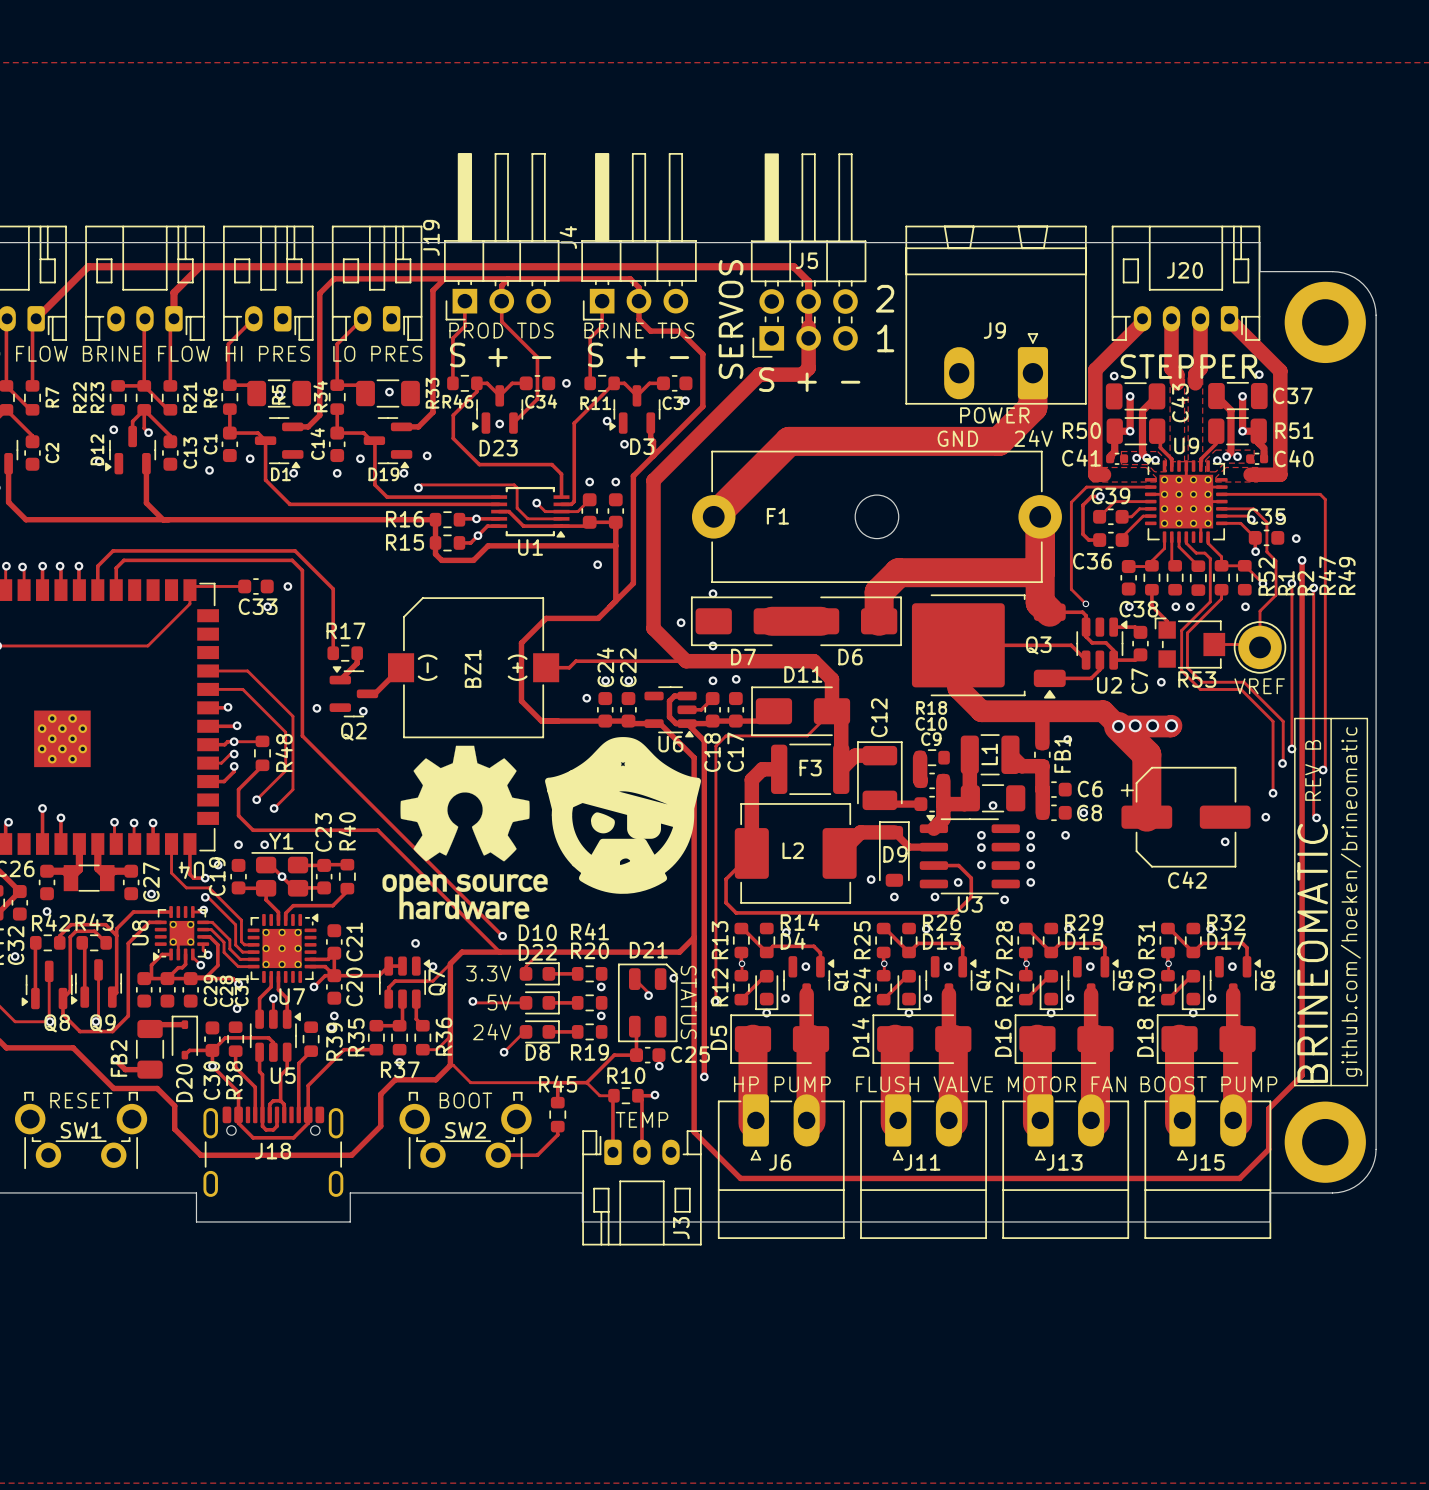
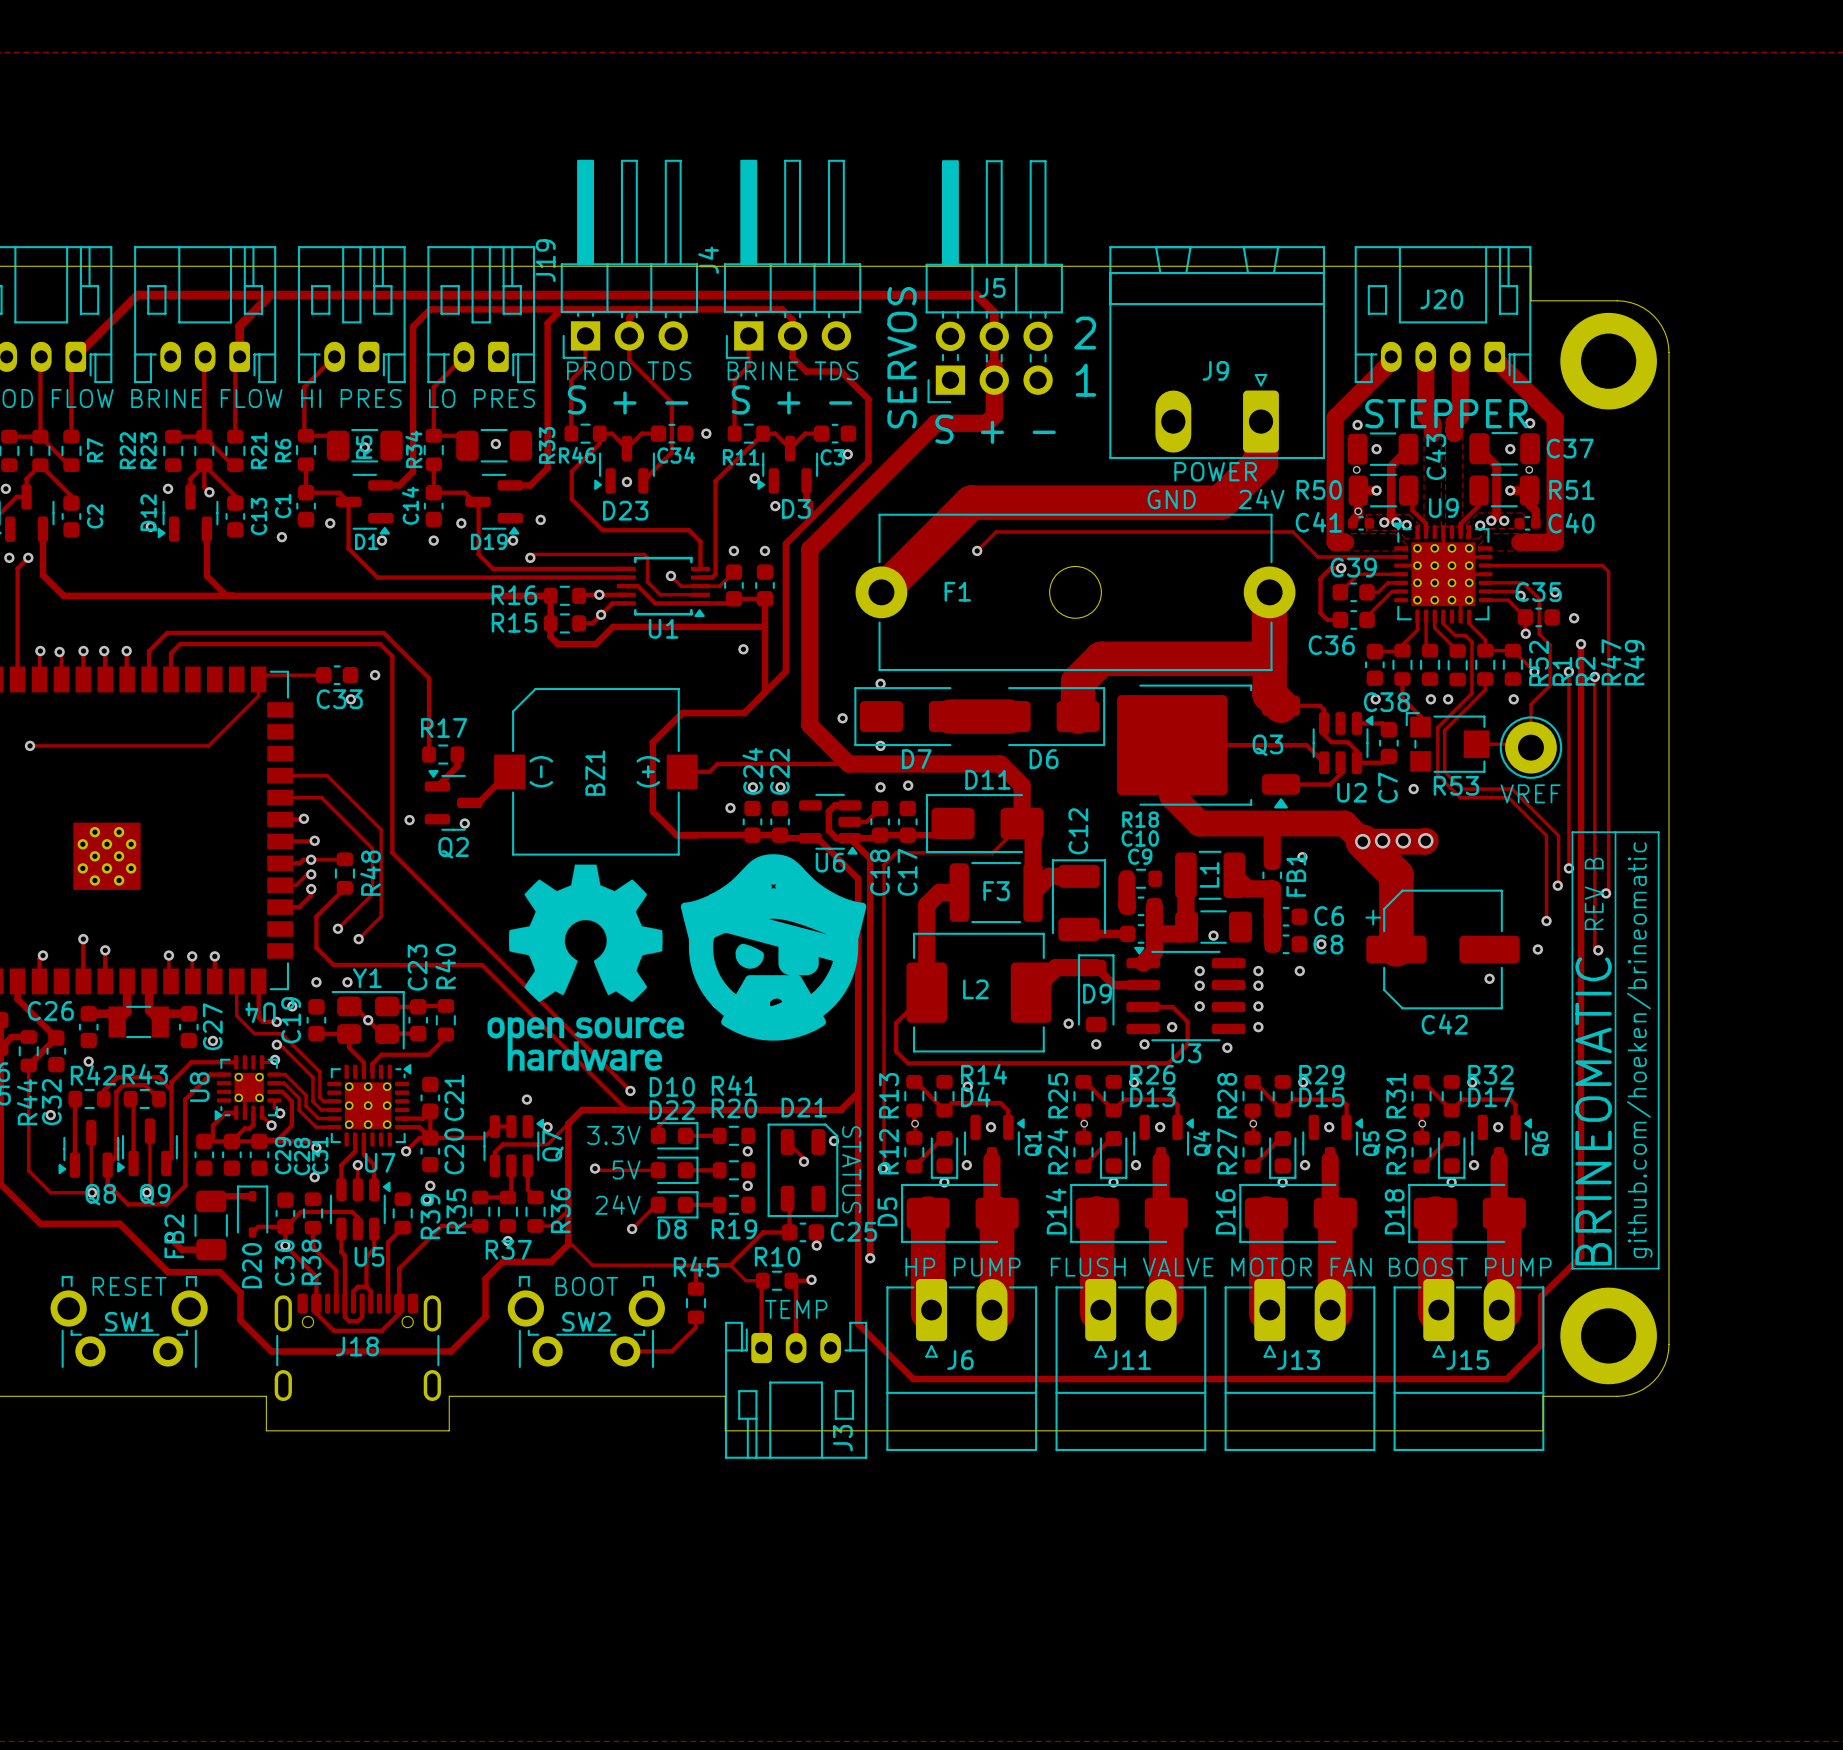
track: (1130, 396) (1130, 431) -> none
track: (1242, 398) (1242, 431) -> none
via: none -> (1356, 469)
via: none -> (1529, 469)
via: none -> (1358, 511)
via: none -> (977, 550)
track: (1086, 487) (1071, 502) (1071, 589) (1085, 603) -> (1324, 556) (1317, 556) (1292, 531) (996, 531) (977, 550)
via: (1085, 603) -> none

